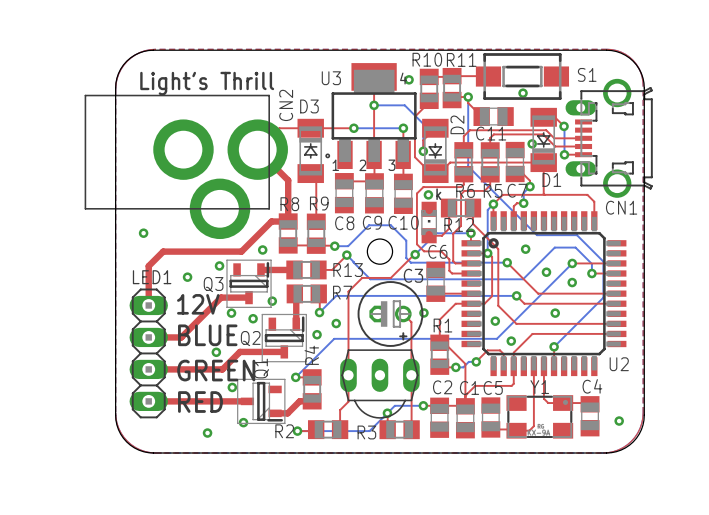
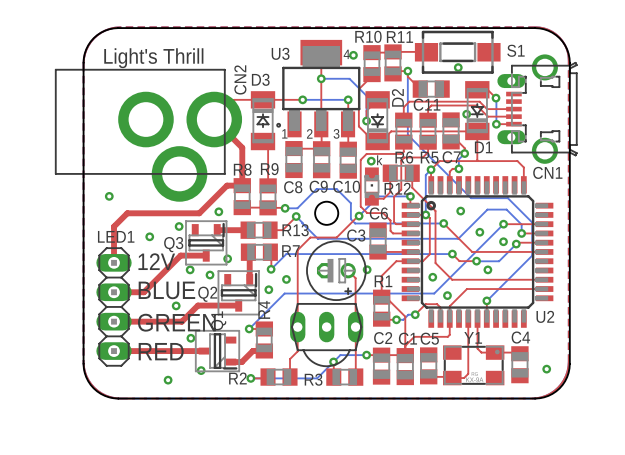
top track: none -> (544, 242) (516, 244)
bottom track: none -> (516, 244) (499, 261) (476, 261)
via: none -> (516, 244)
top track: (524, 303) (616, 303) -> (459, 261) (476, 261)
via: none -> (476, 261)

